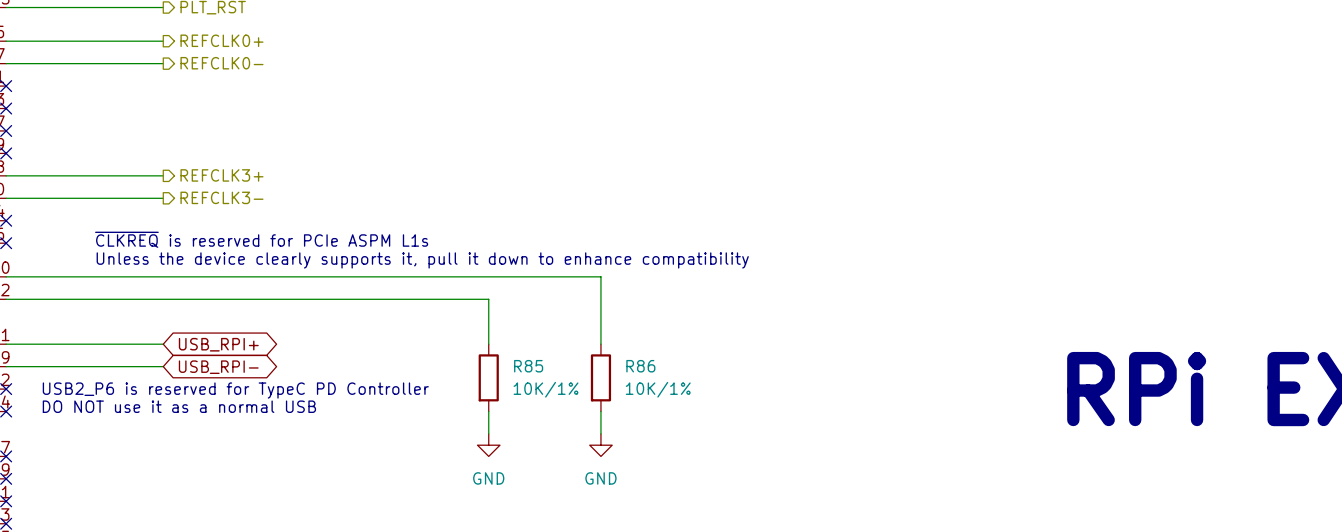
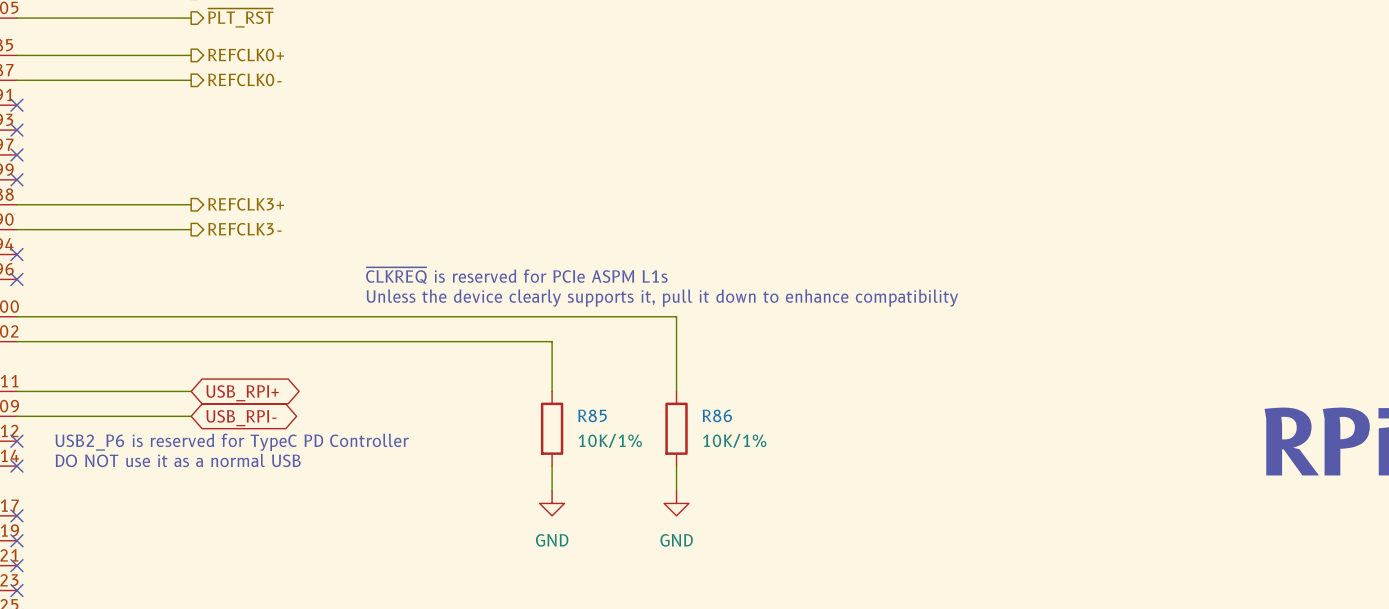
text: ~{CLKREQ} is reserved for PCIe ASPM L1s (261, 239) -> none
text: none -> ~{CLKREQ} is reserved for PCIe ASPM L1s (516, 275)
text: Unless the device clearly supports it, pull it down to enhance compatibility (422, 260) -> none
text: none -> Unless the device clearly supports it, pull it down to enhance compatibility (662, 298)

